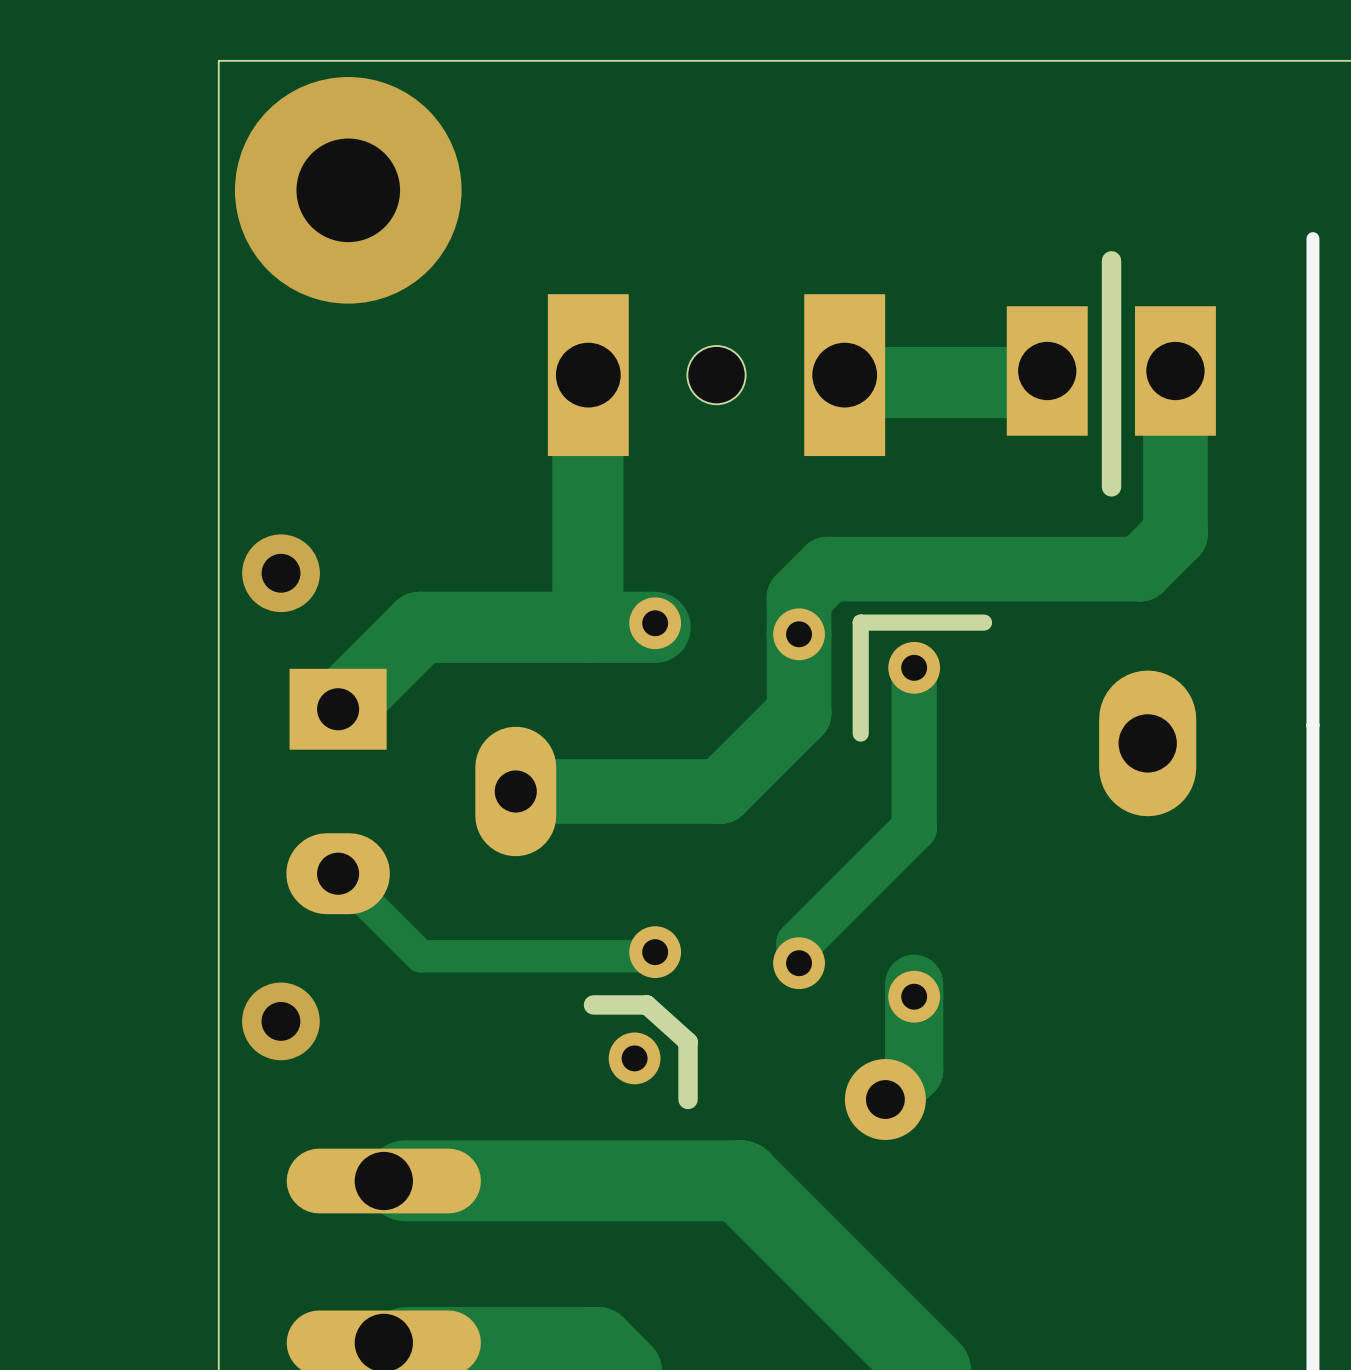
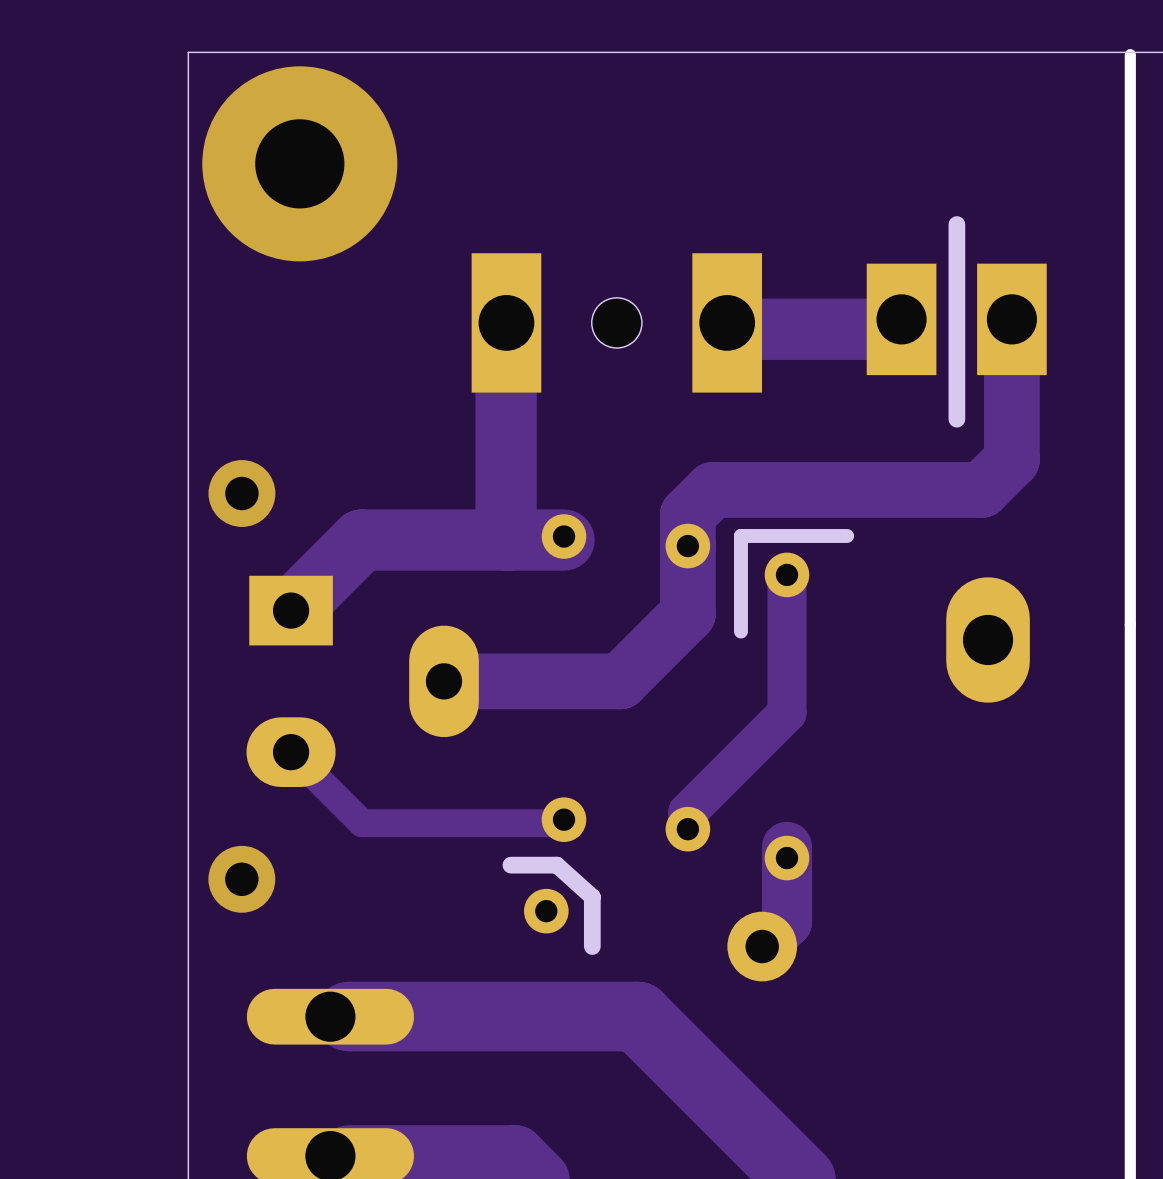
line: none -> (1130, 54) (1130, 205)

